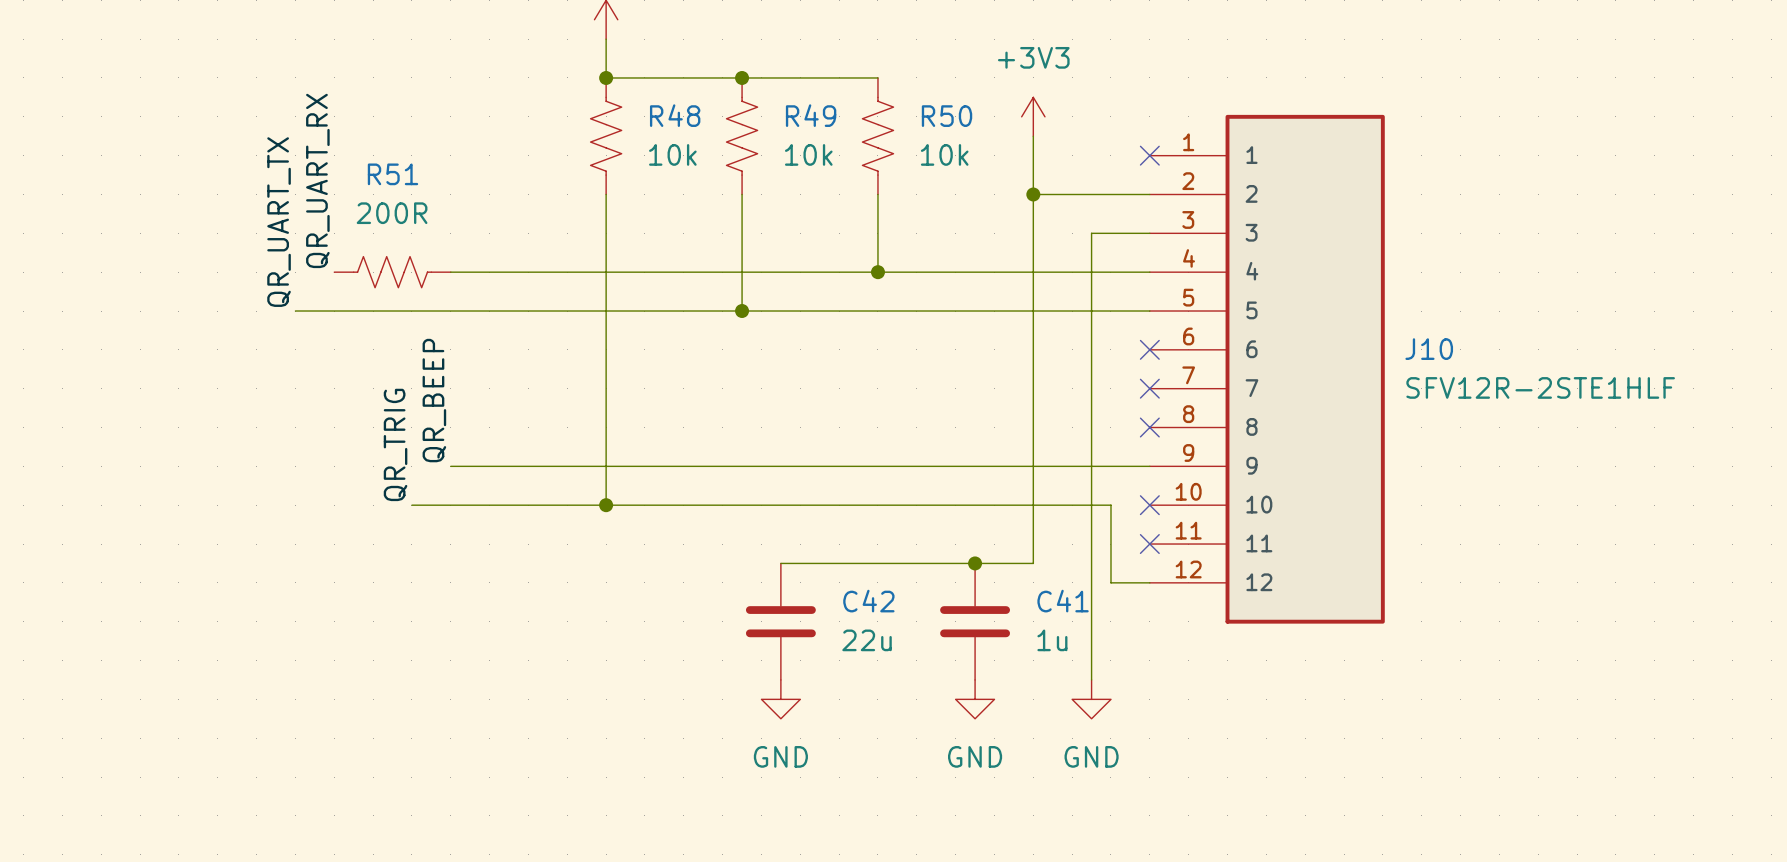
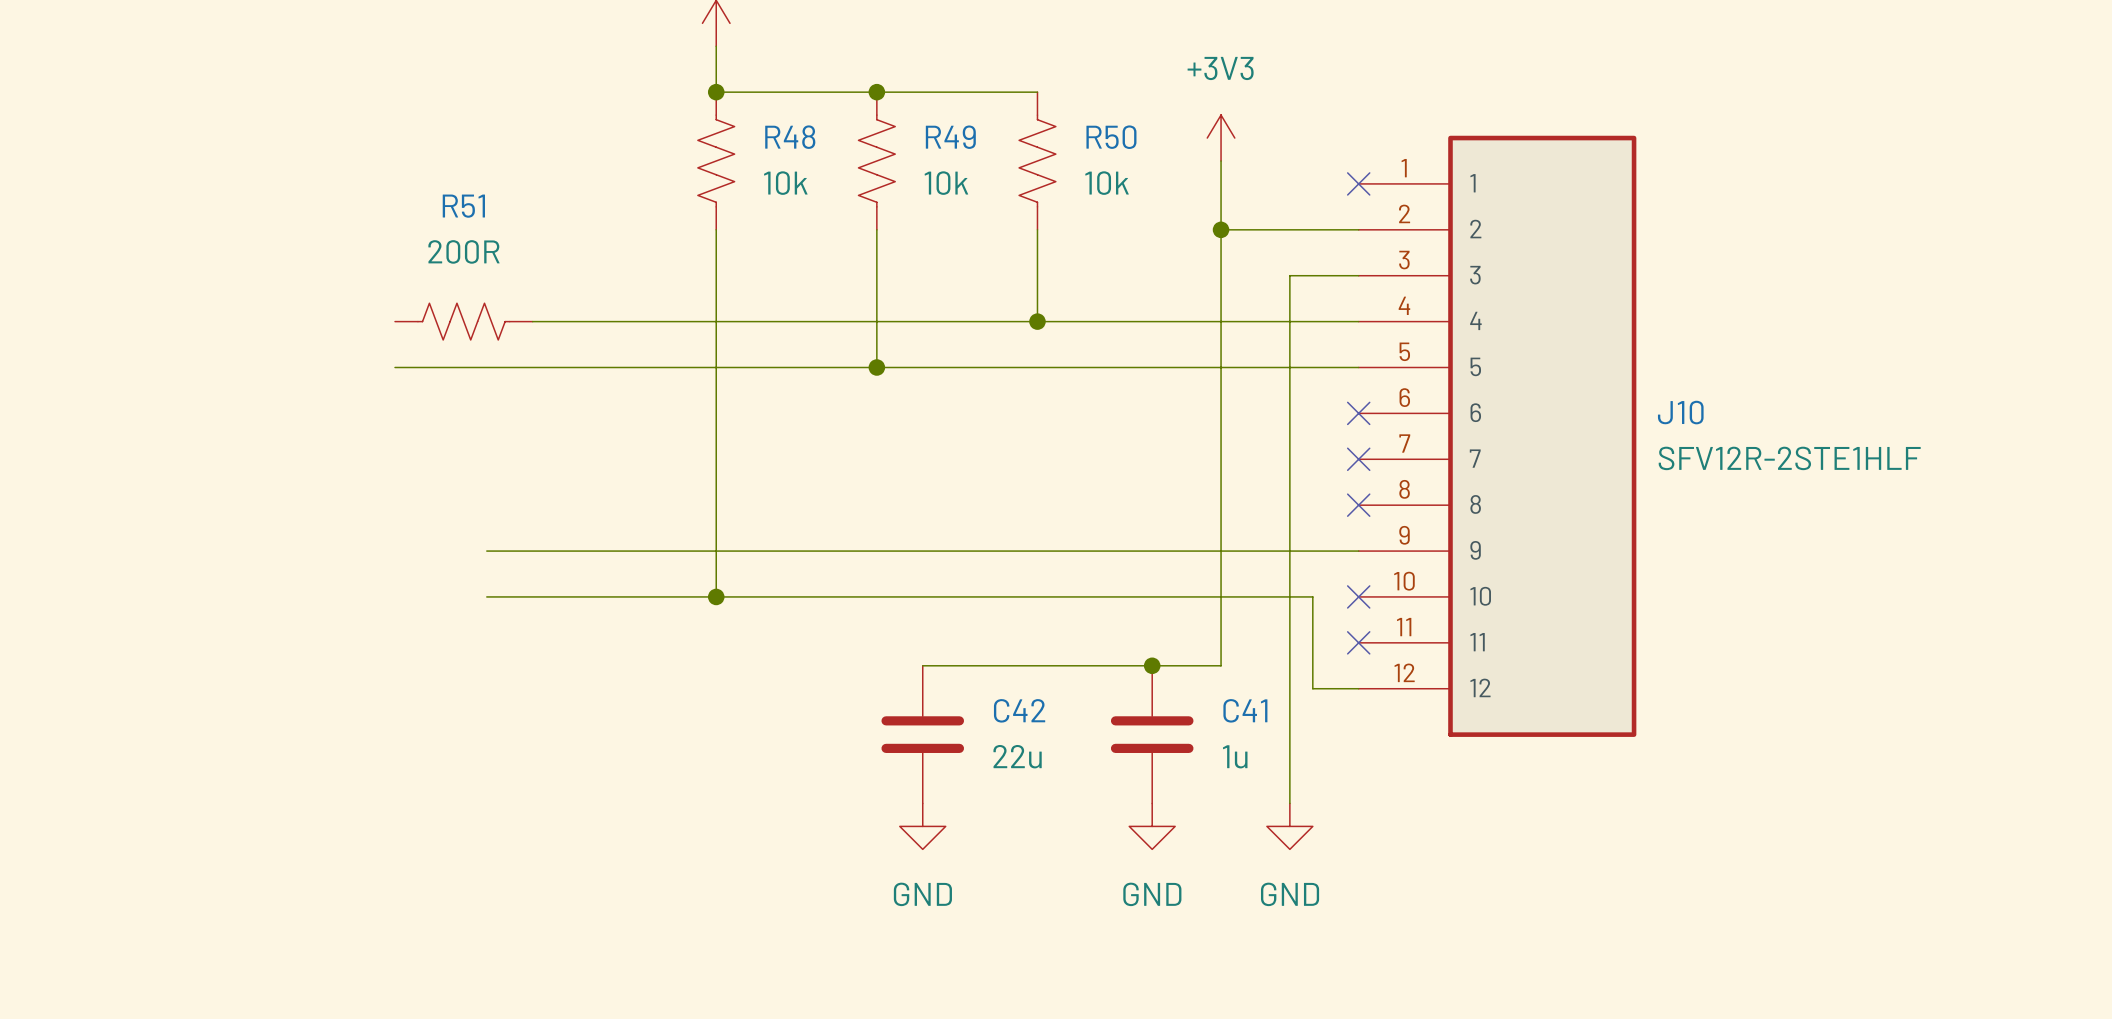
label: QR_UART_RX (317, 180) -> none
label: QR_UART_TX (279, 222) -> none
wire: (295, 311) (334, 311) -> (486, 551) (532, 551)
label: QR_BEEP (434, 400) -> none
label: QR_TRIG (395, 444) -> none

